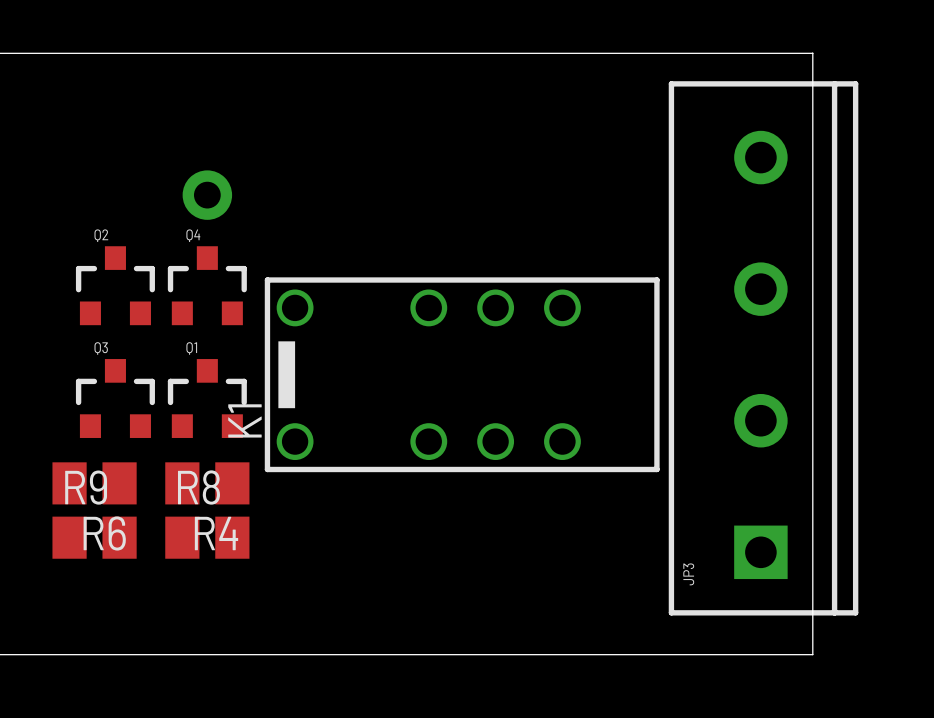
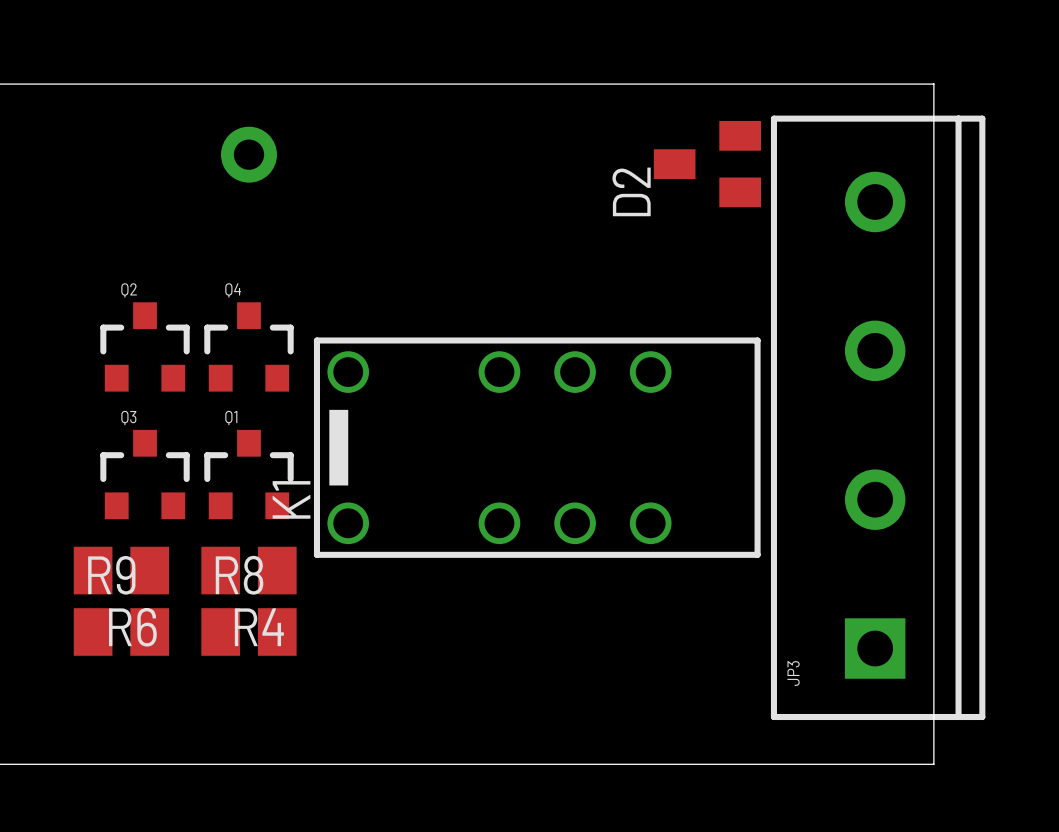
D2: none -> (707, 164)
part position: (207, 195) -> (248, 154)

